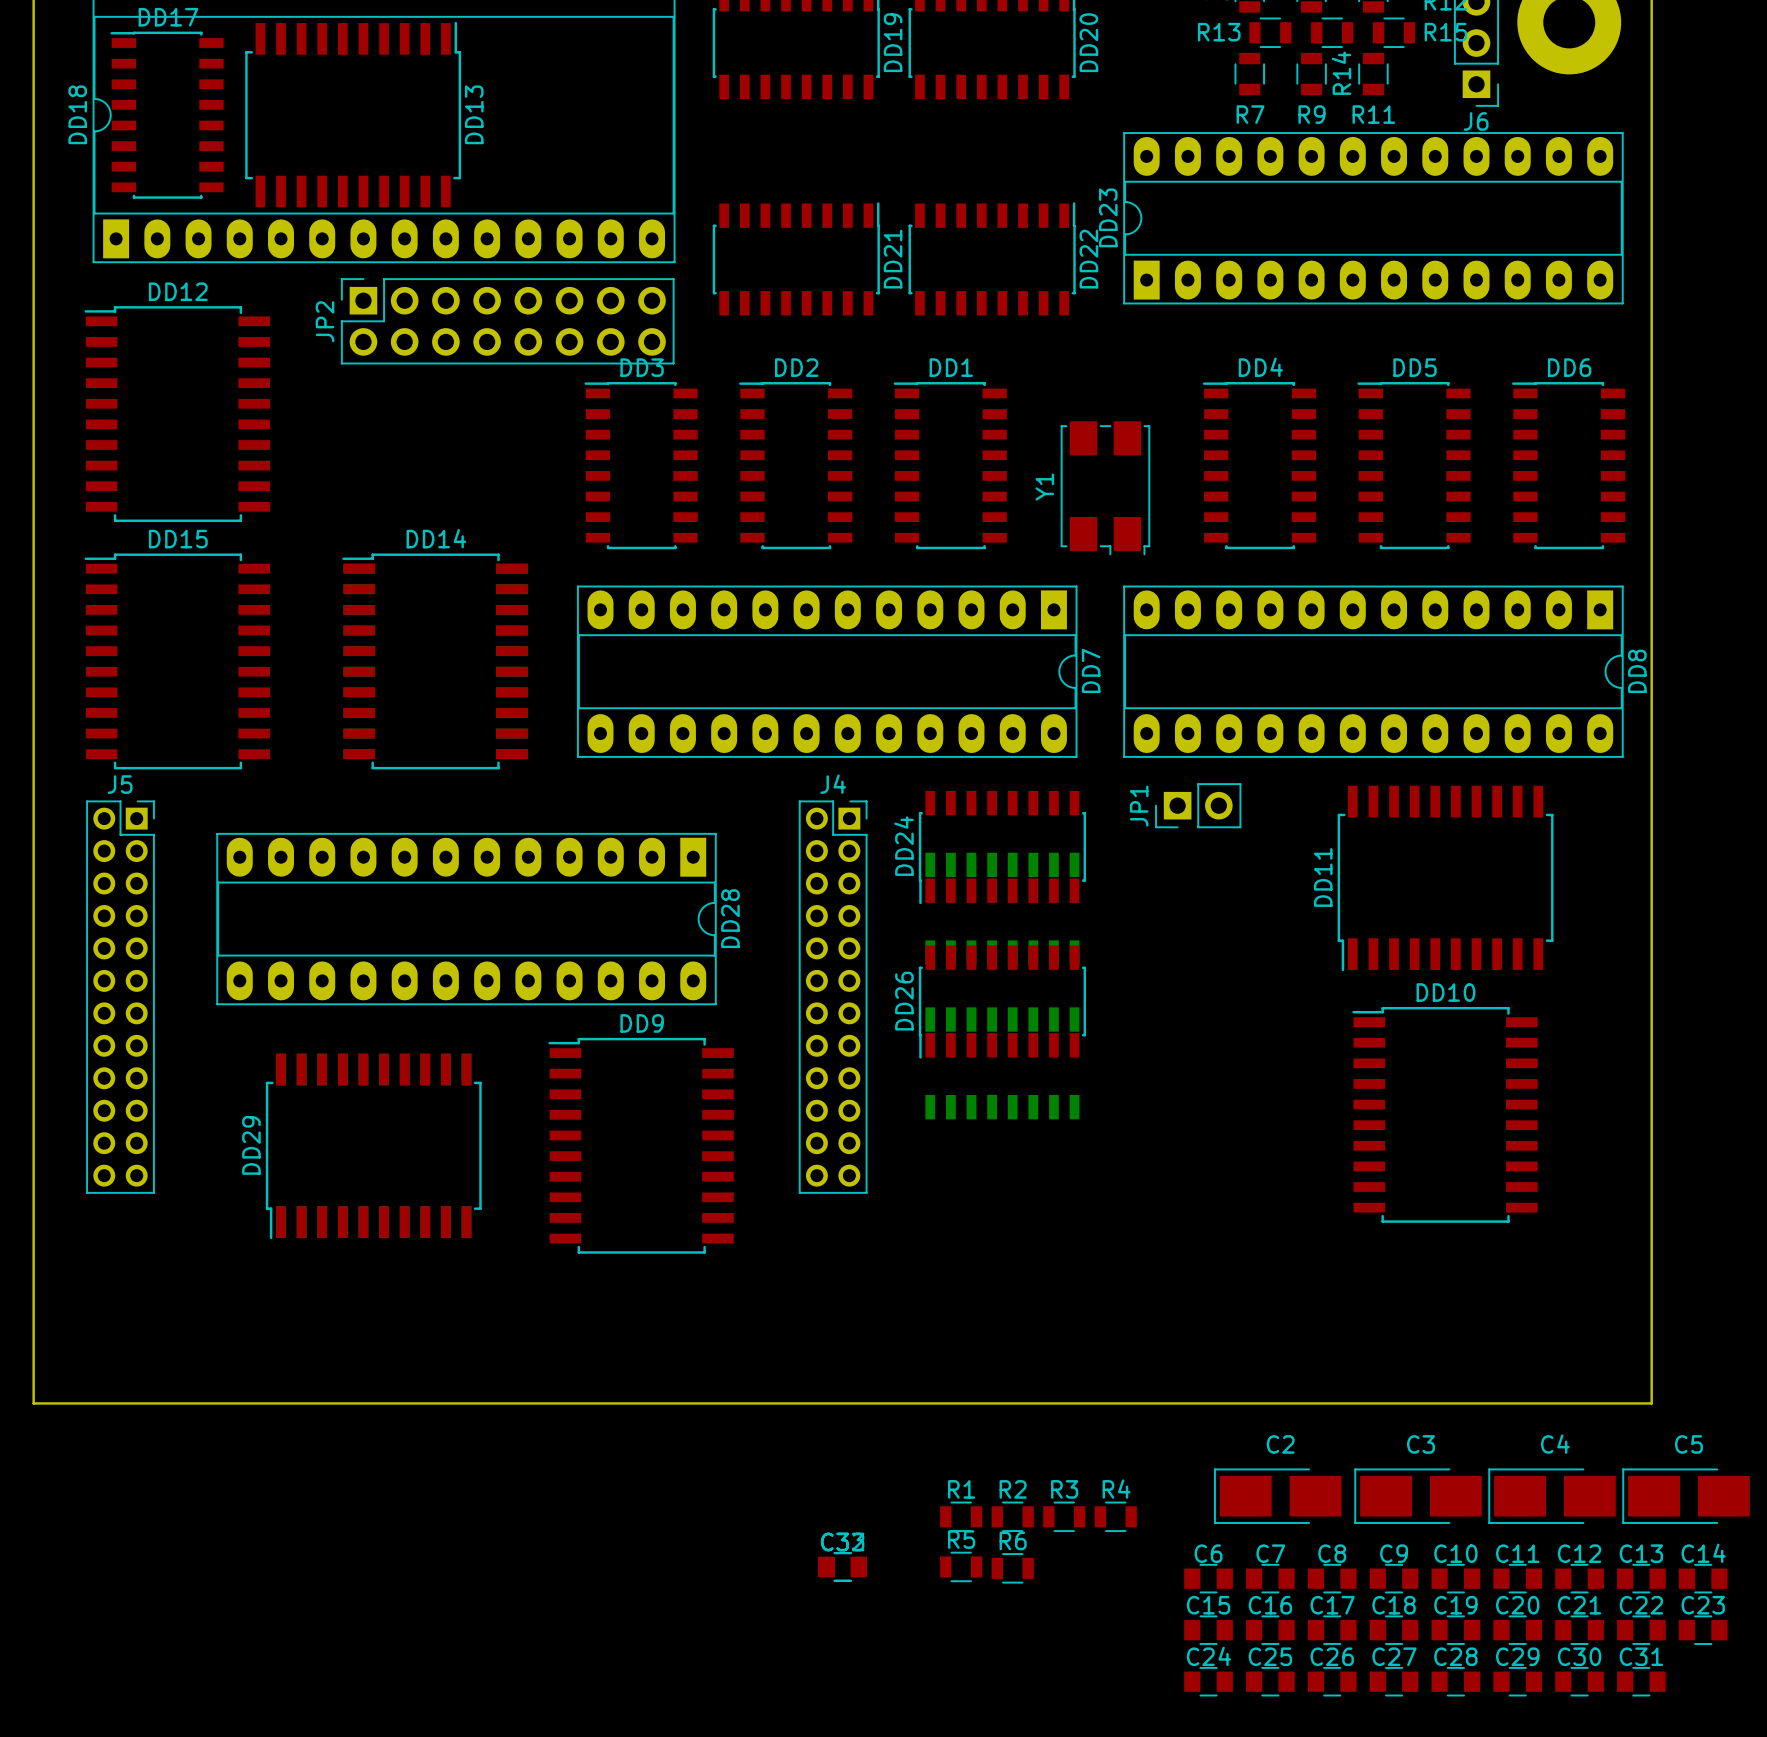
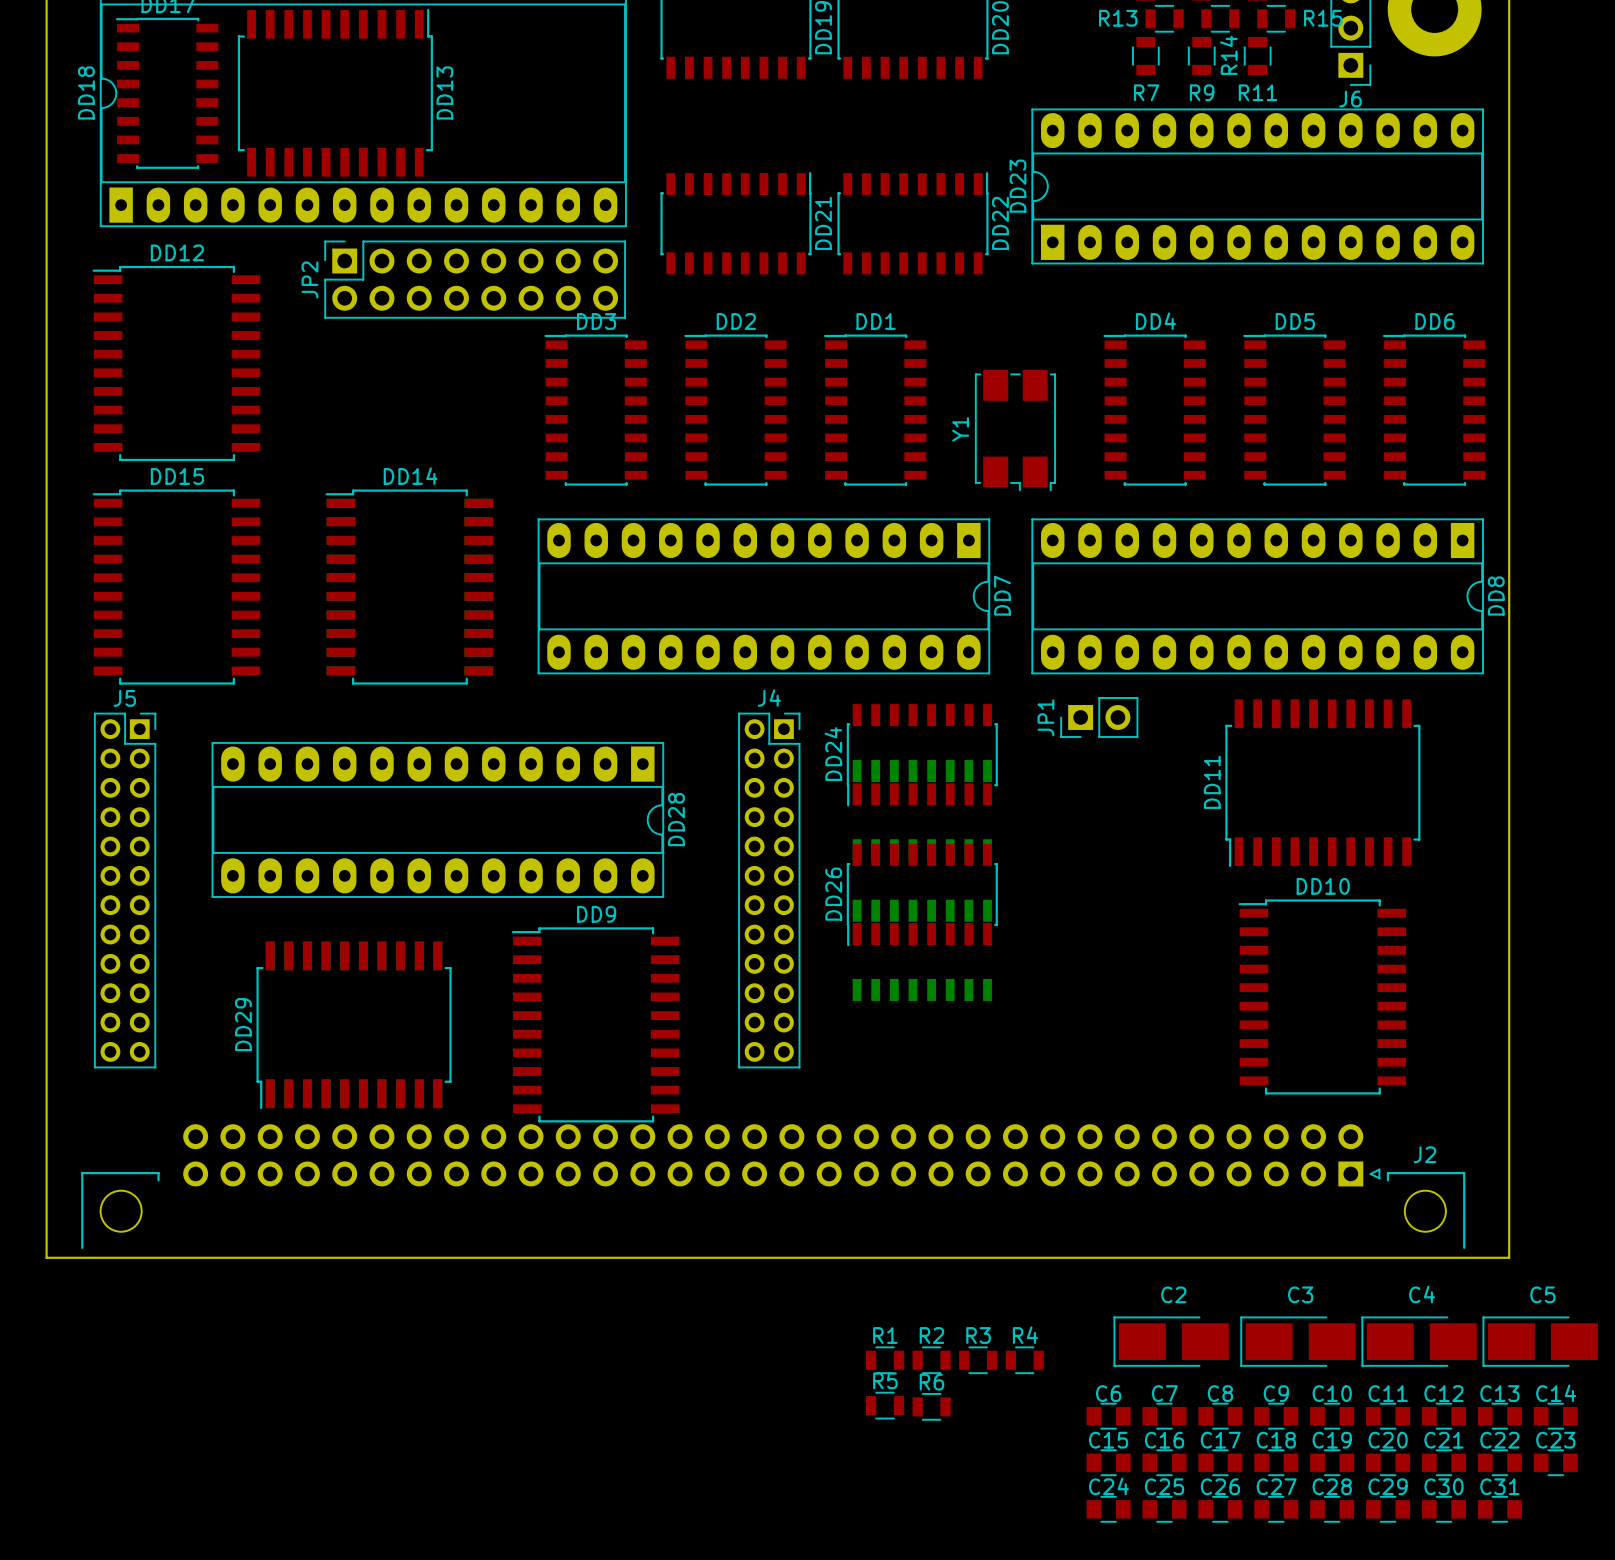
J2: none -> (773, 1186)
part: (842, 1566) -> none
part: (842, 1566) -> none

